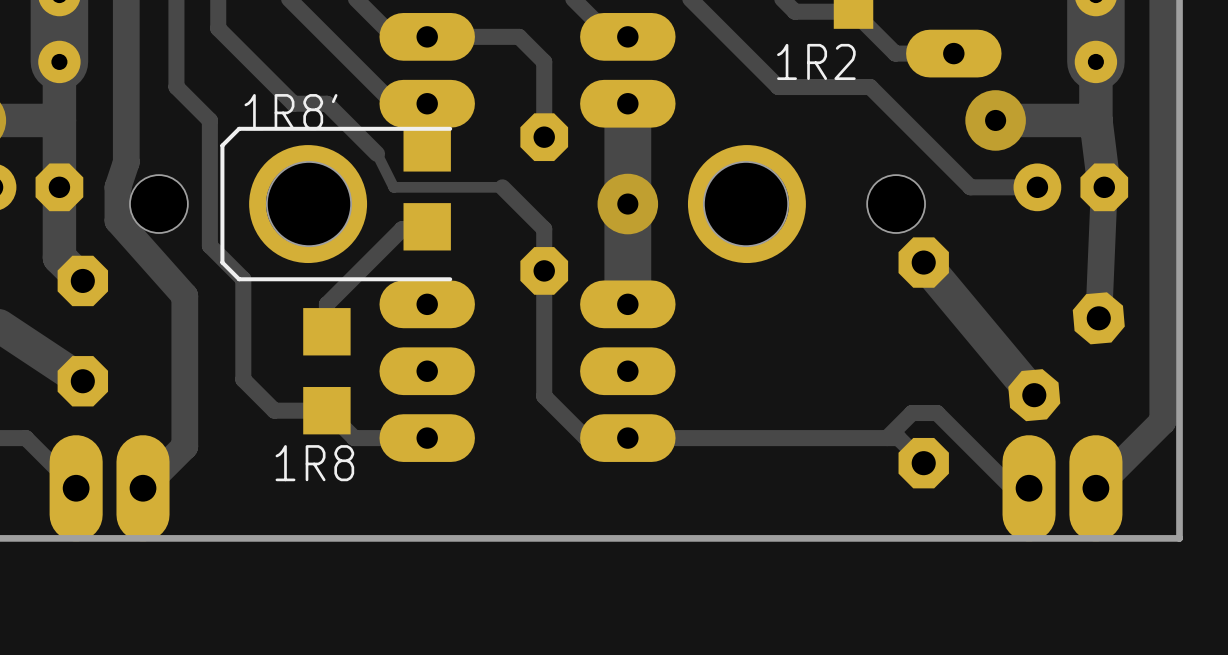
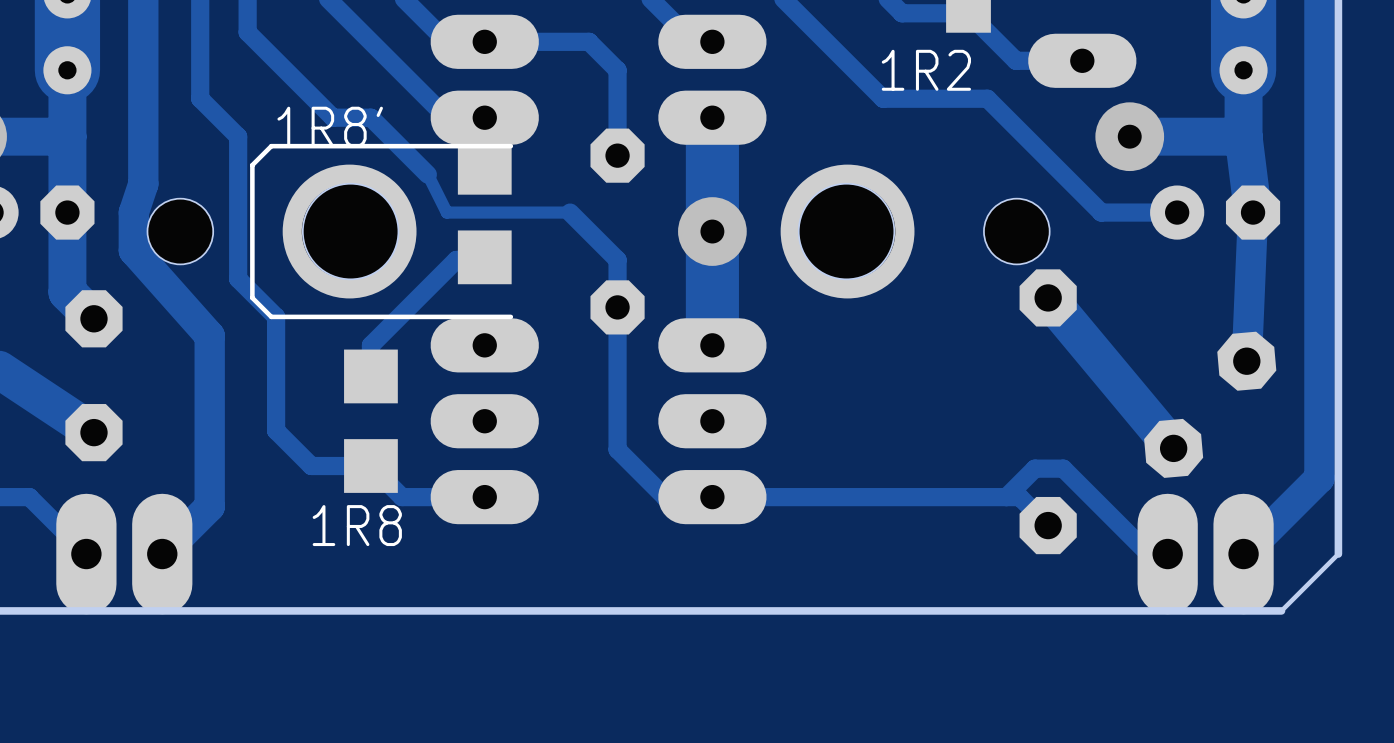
board edge: (1179, 488) (1179, 538) (1129, 538) -> (1338, 554) (1281, 610)

